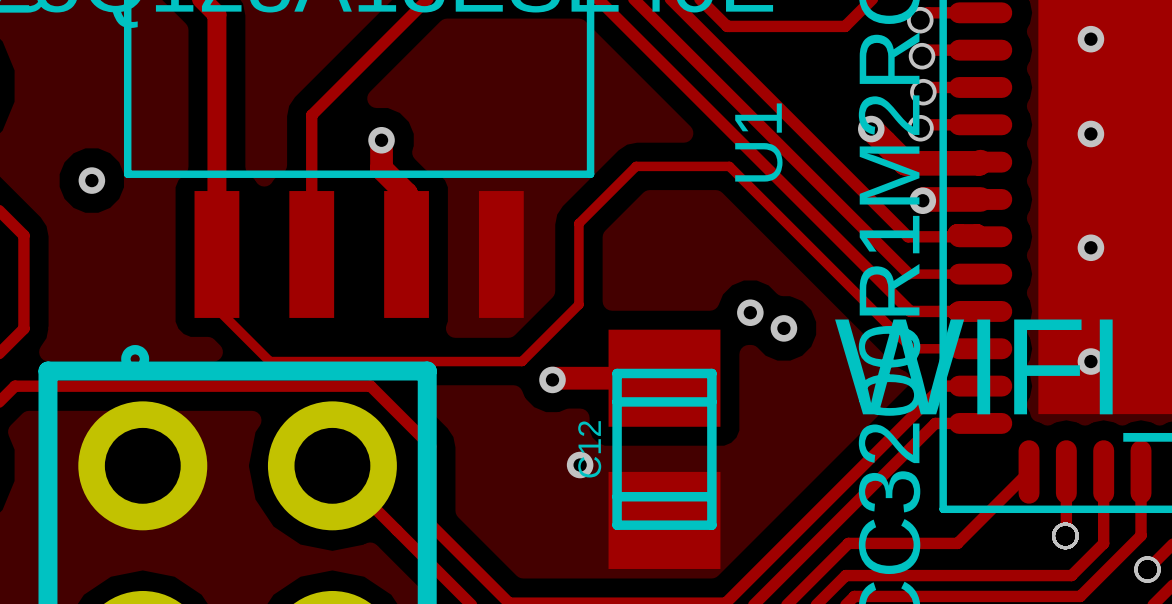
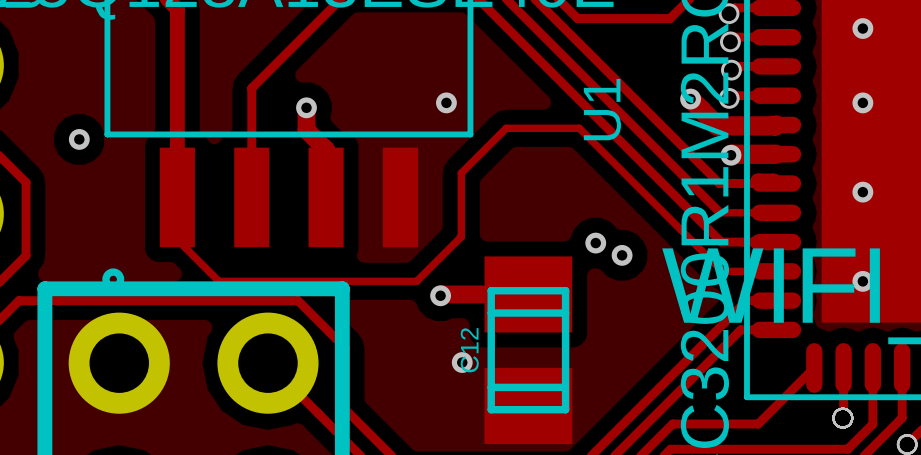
via: none -> (446, 102)

